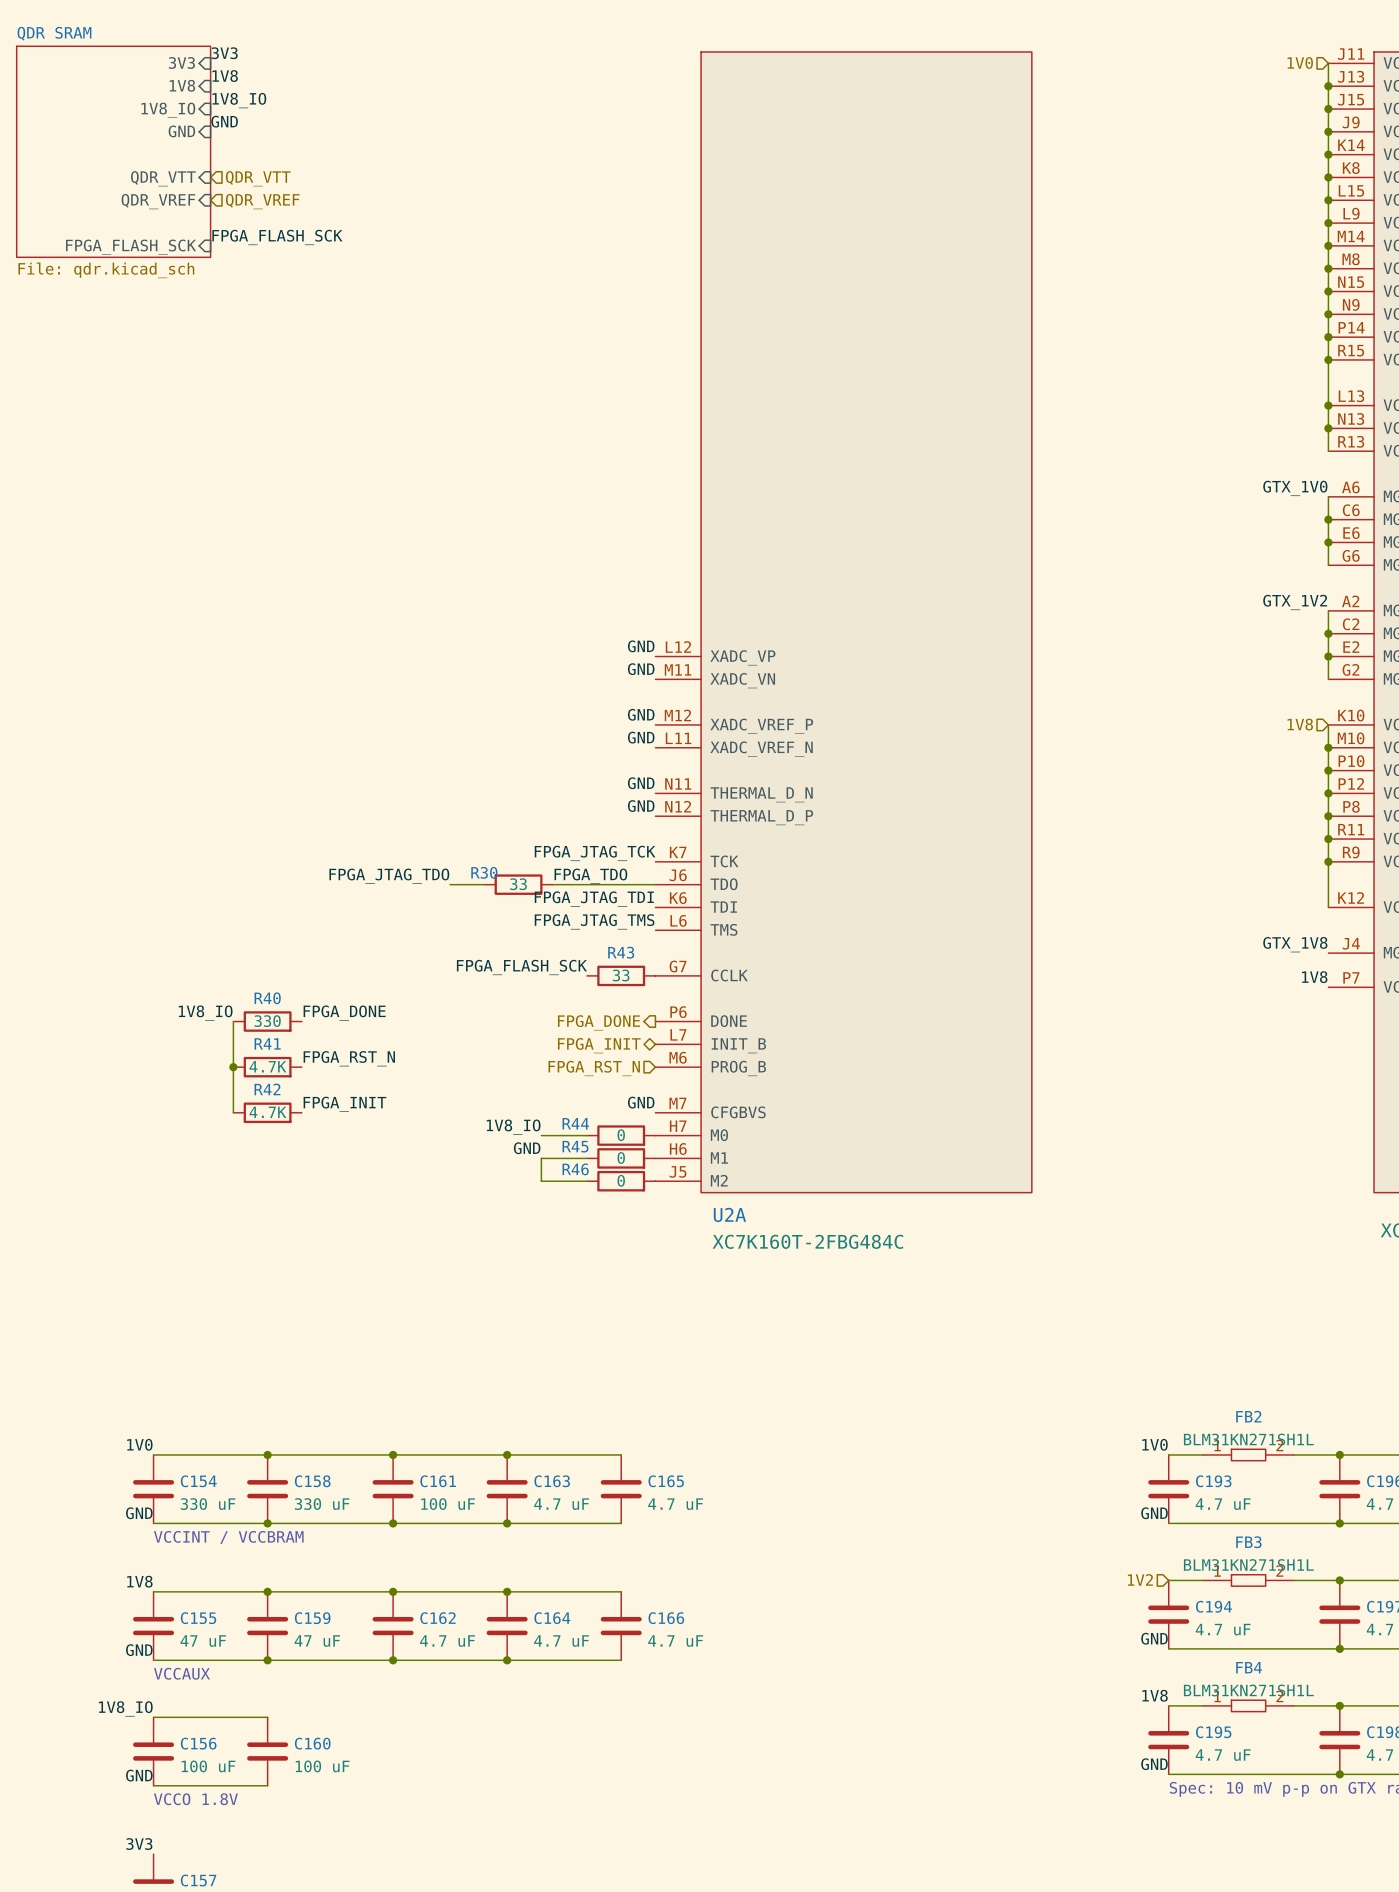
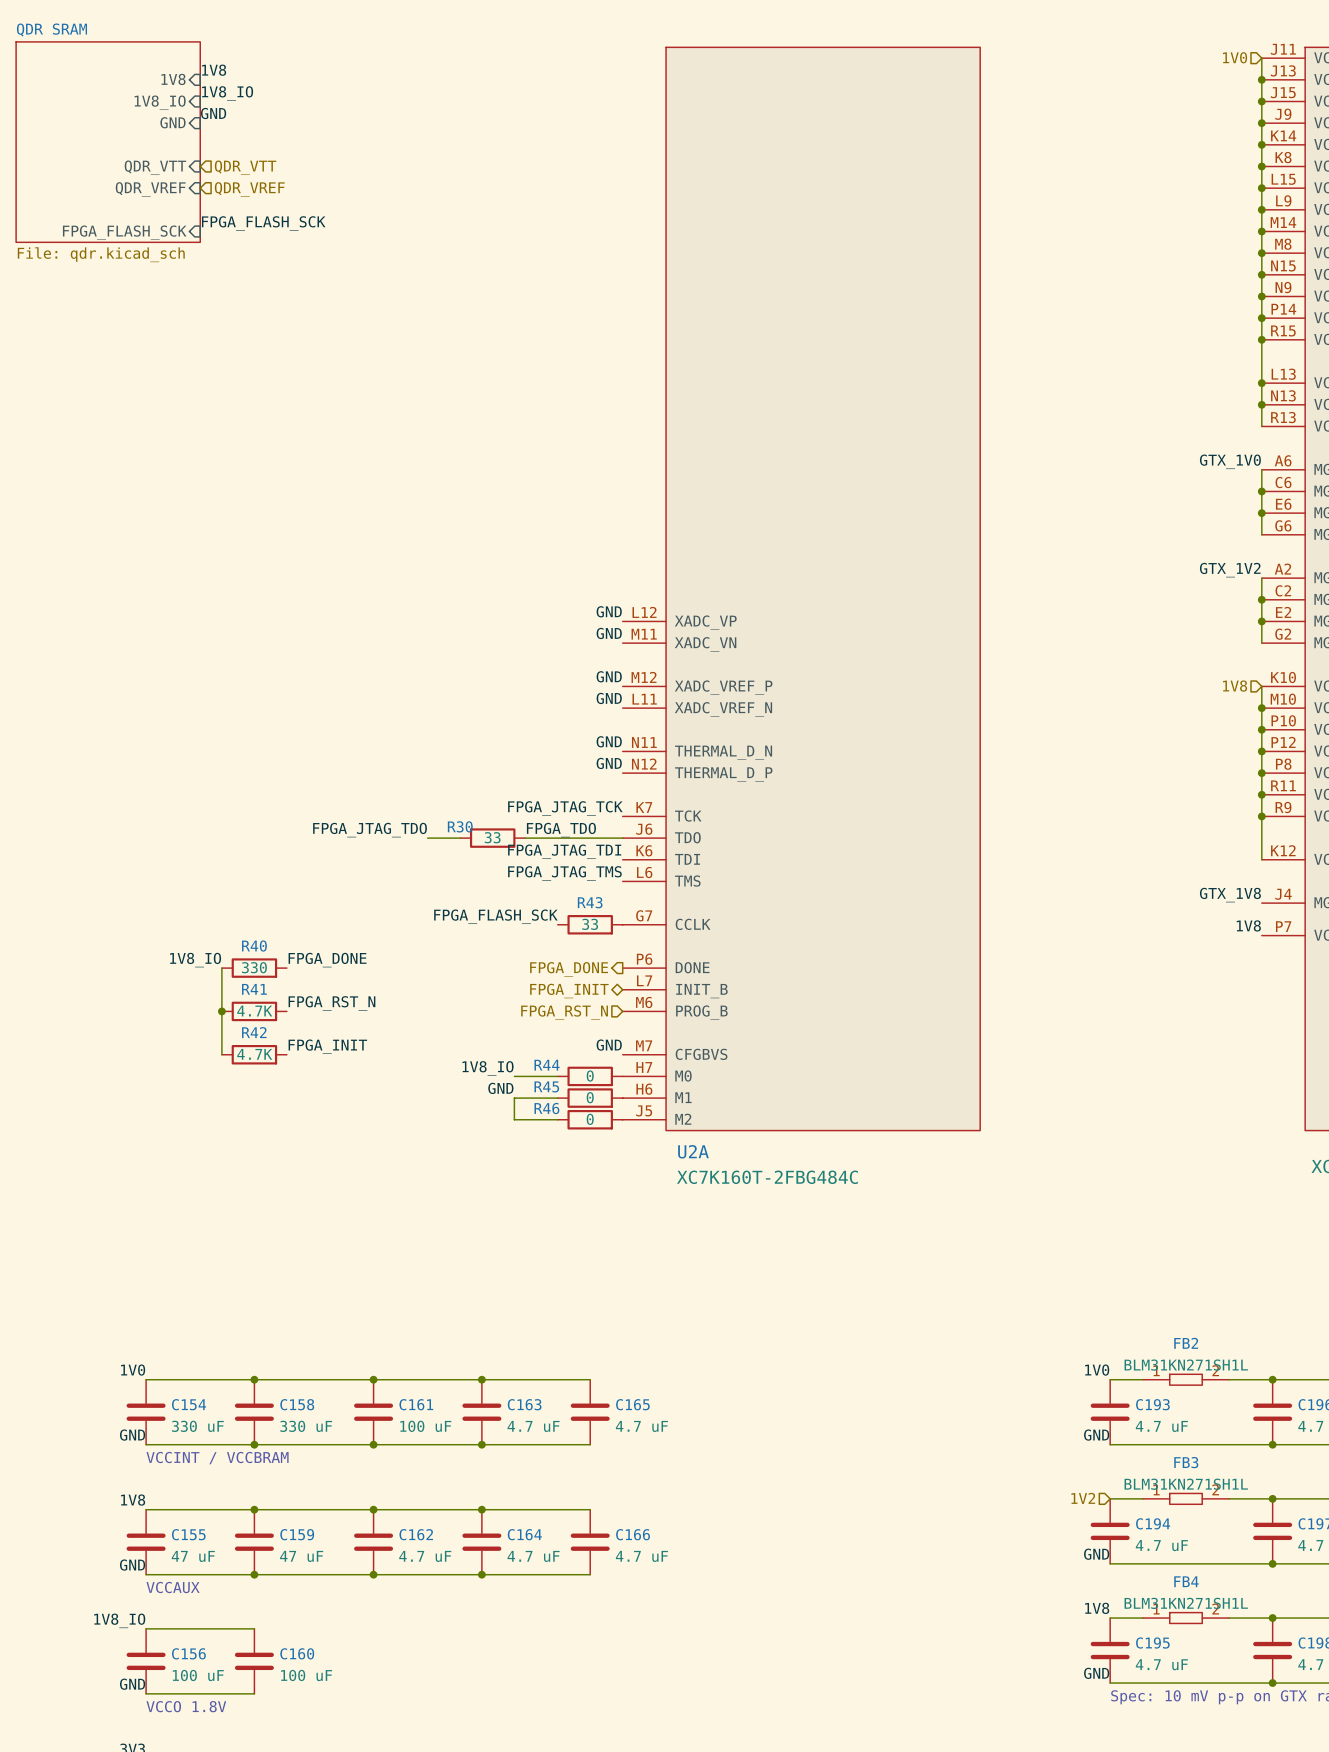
label: 3V3 (224, 53) -> none
sheet pin: 3V3 (181, 62) -> none

